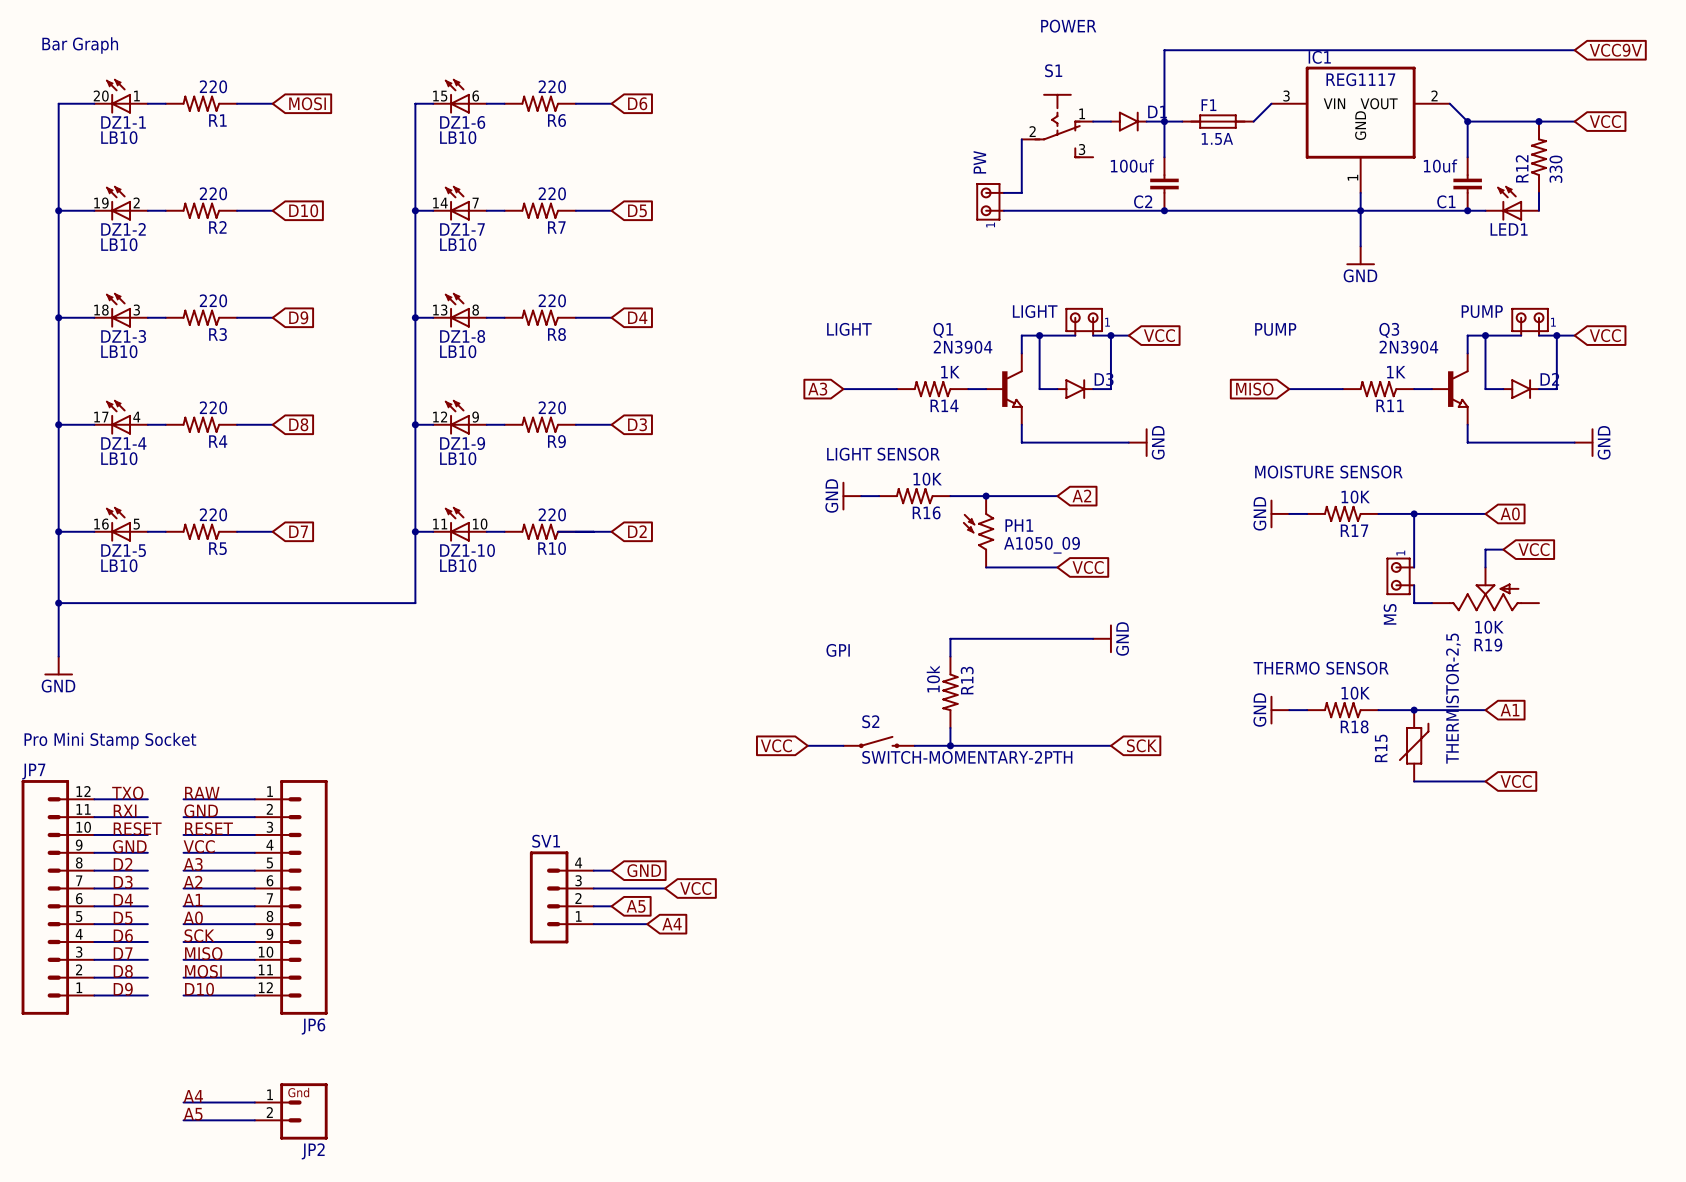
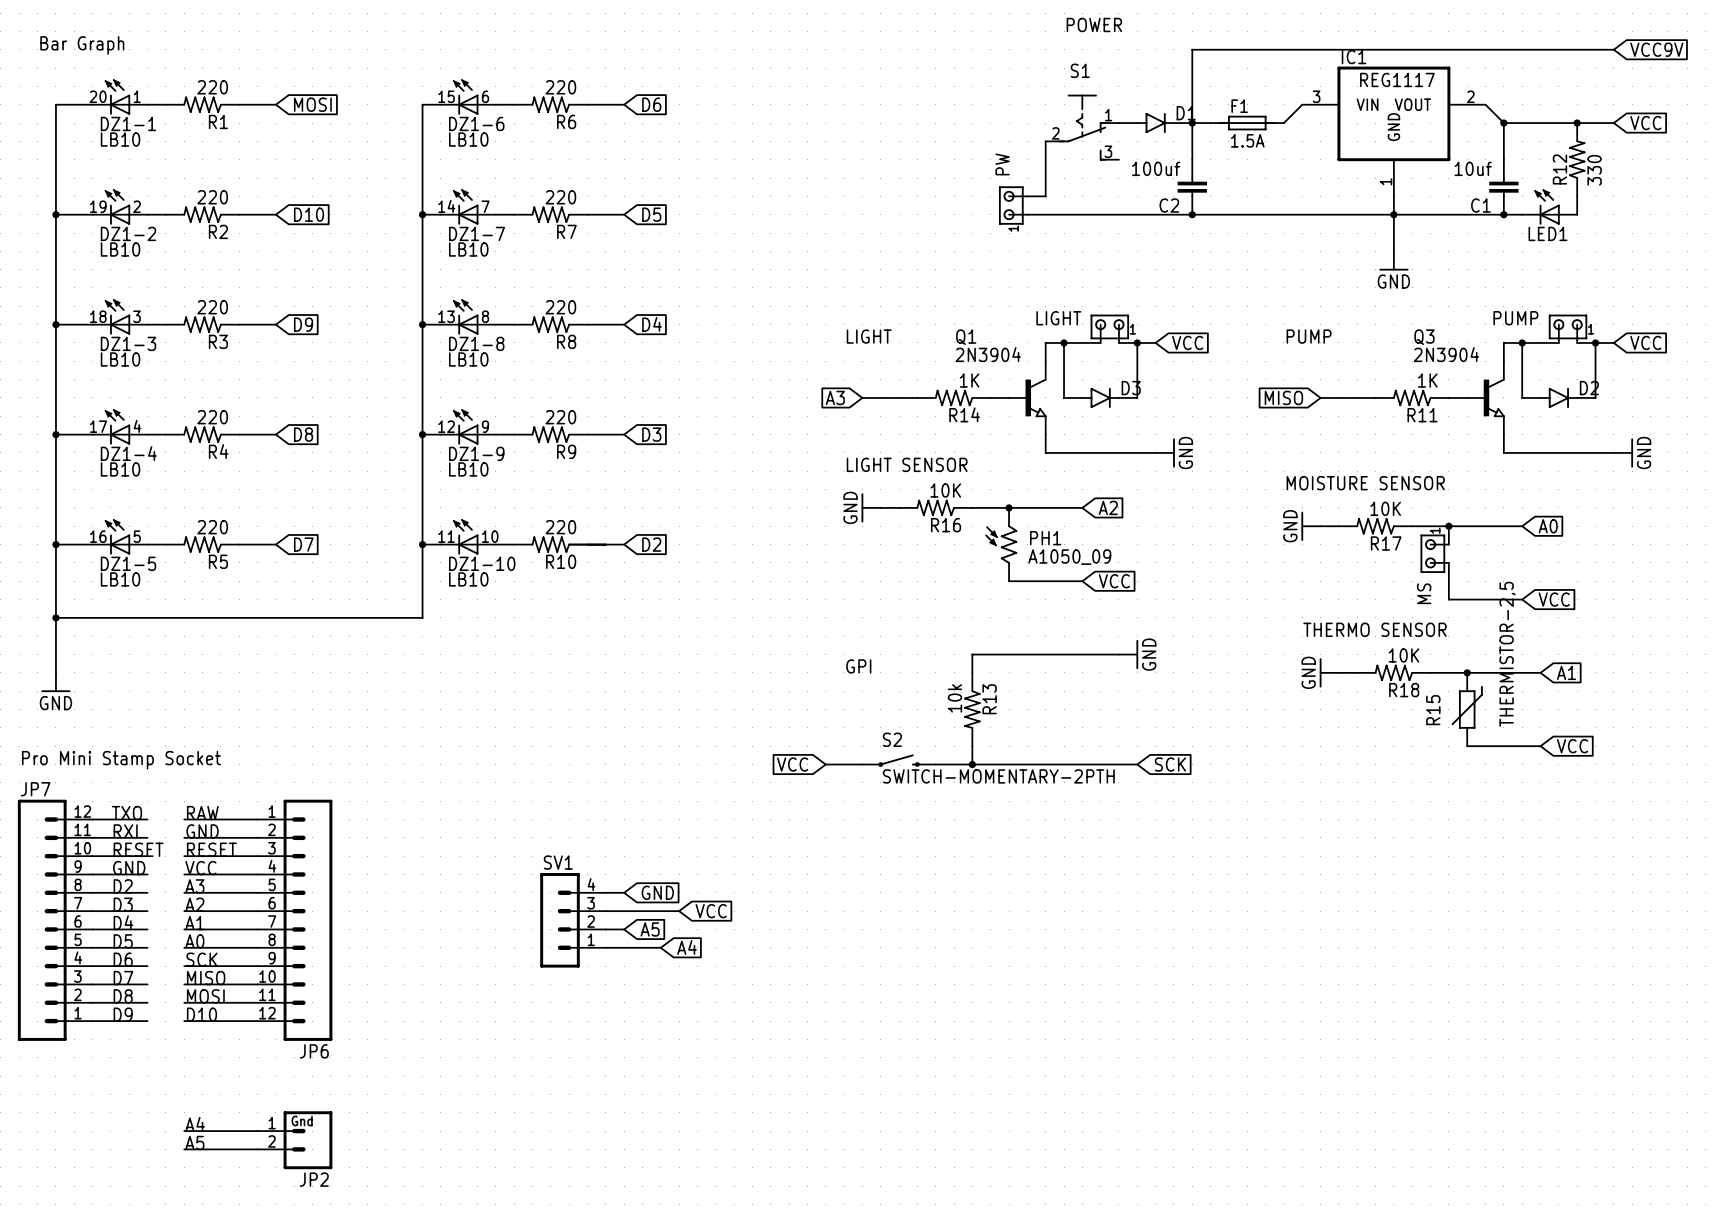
wire: (1414, 531) (1414, 549) -> none
wire: (1503, 549) (1485, 549) (1485, 567) -> none
global label position: VCC (1533, 549) -> VCC (1554, 599)
wire: none -> (1448, 581) (1448, 599) (1522, 599)
MS position: (1400, 576) -> (1434, 553)
wire: (1414, 585) (1414, 603) (1431, 603) -> none
R19: 10K (1485, 589) -> none
junction: none -> (1467, 672)
text position: THERMO SENSOR (1321, 668) -> THERMO SENSOR (1374, 629)
power symbol position: GND (1279, 710) -> GND (1329, 672)
wire: (1289, 710) (1307, 710) -> (1338, 672) (1357, 672)
R18 position: (1342, 710) -> (1393, 672)
wire: (1378, 710) (1485, 710) -> (1430, 672) (1540, 672)
junction: (1414, 710) -> none
global label position: A1 (1510, 710) -> A1 (1566, 672)
R15 position: (1414, 745) -> (1467, 709)
wire: (1414, 781) (1485, 781) -> (1467, 746) (1540, 746)
global label position: VCC (1516, 781) -> VCC (1572, 746)

